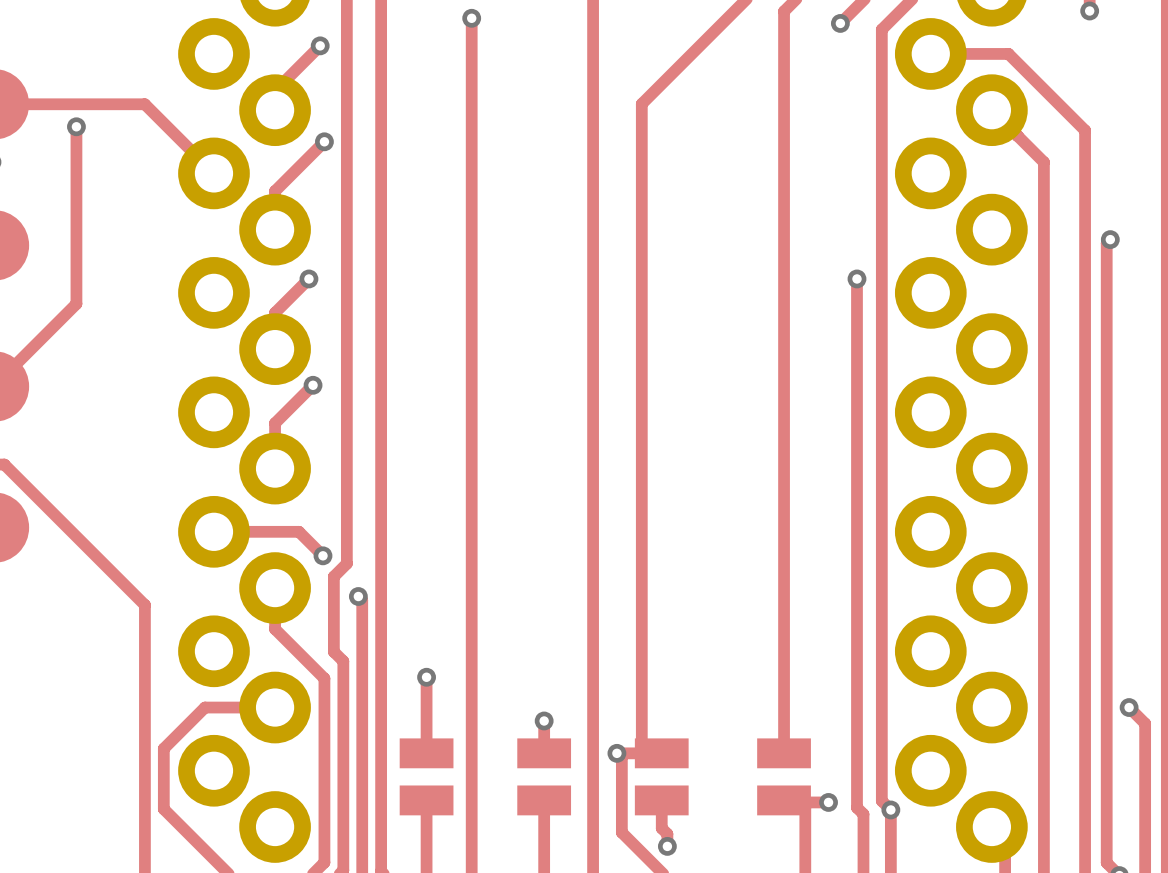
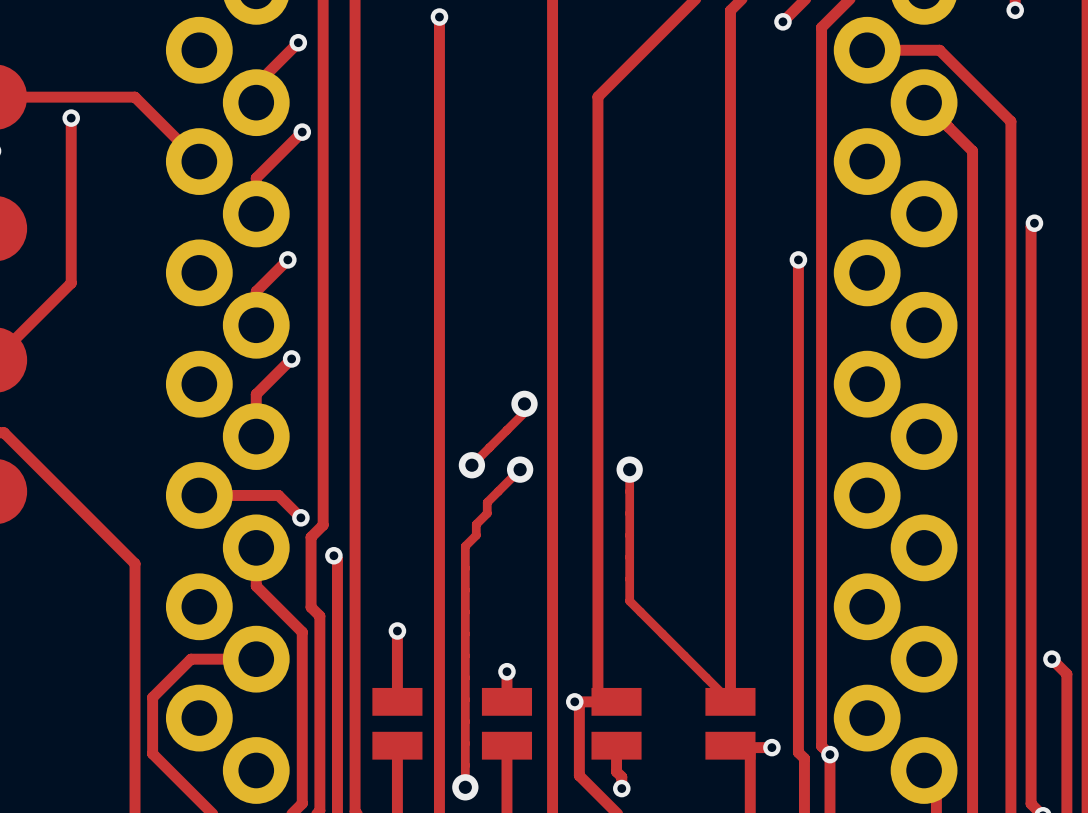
track: none -> (524, 403) (524, 412) (471, 465)
via: none -> (524, 403)
via: none -> (471, 465)
track: none -> (520, 469) (487, 502) (487, 513) (476, 524) (476, 535) (465, 546) (465, 787)
via: none -> (520, 469)
track: none -> (629, 469) (629, 601) (730, 701)
via: none -> (629, 469)
via: none -> (465, 787)

